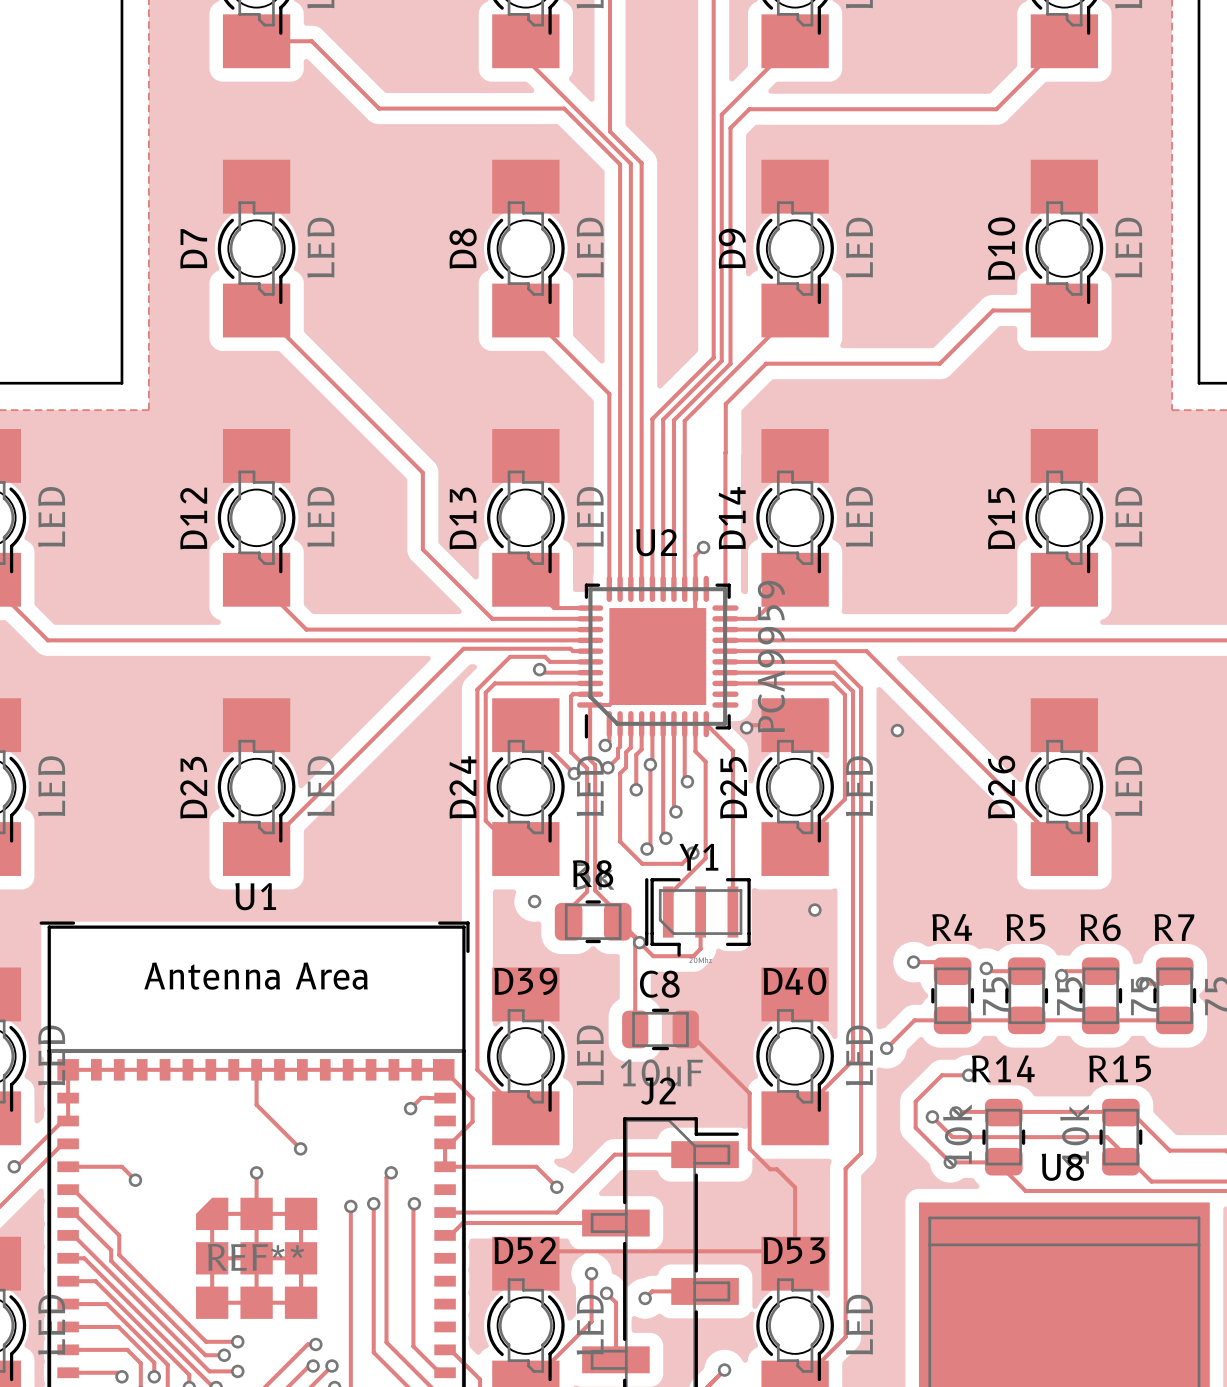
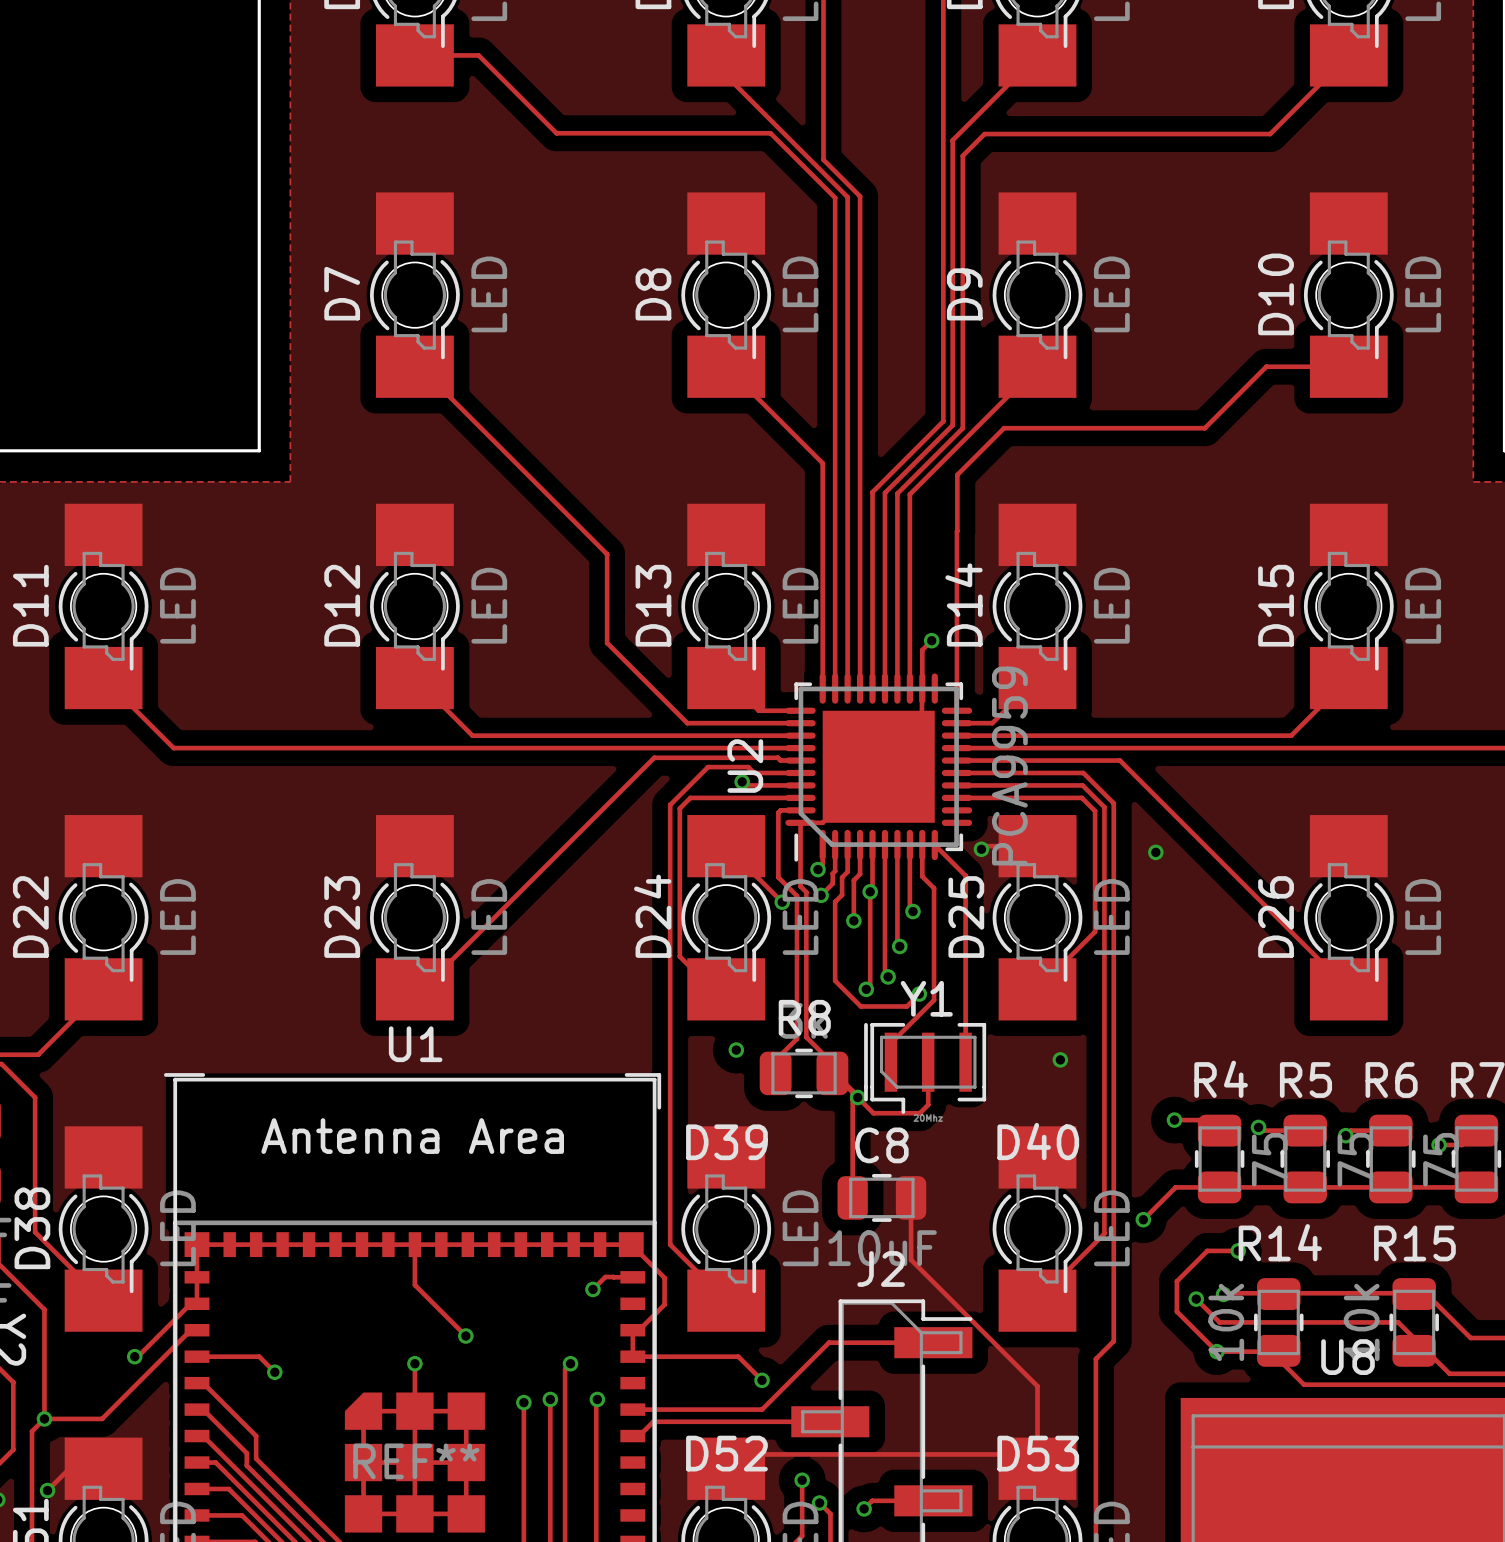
U2 name rotation: 0° (656, 542) -> 90° counterclockwise (745, 766)
U2 name position: U2 (656, 542) -> U2 (745, 766)
track: (685, 1029) (749, 1093) (749, 1148) (770, 1169) (777, 1169) (795, 1187) (795, 1192) -> (911, 1197) (911, 1259) (1037, 1386)

